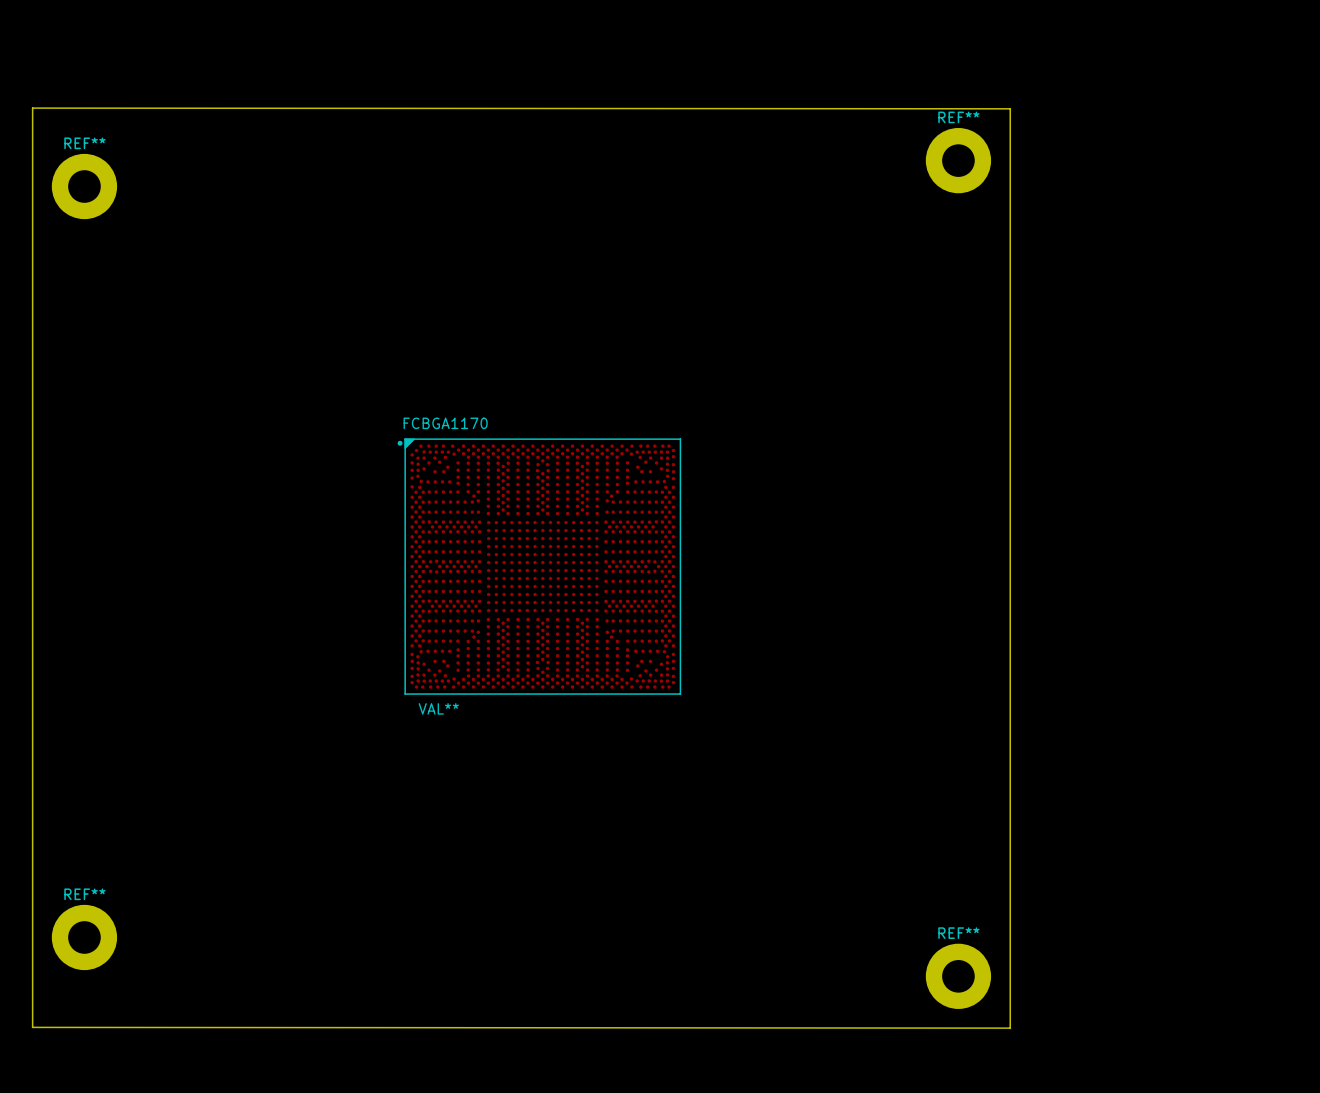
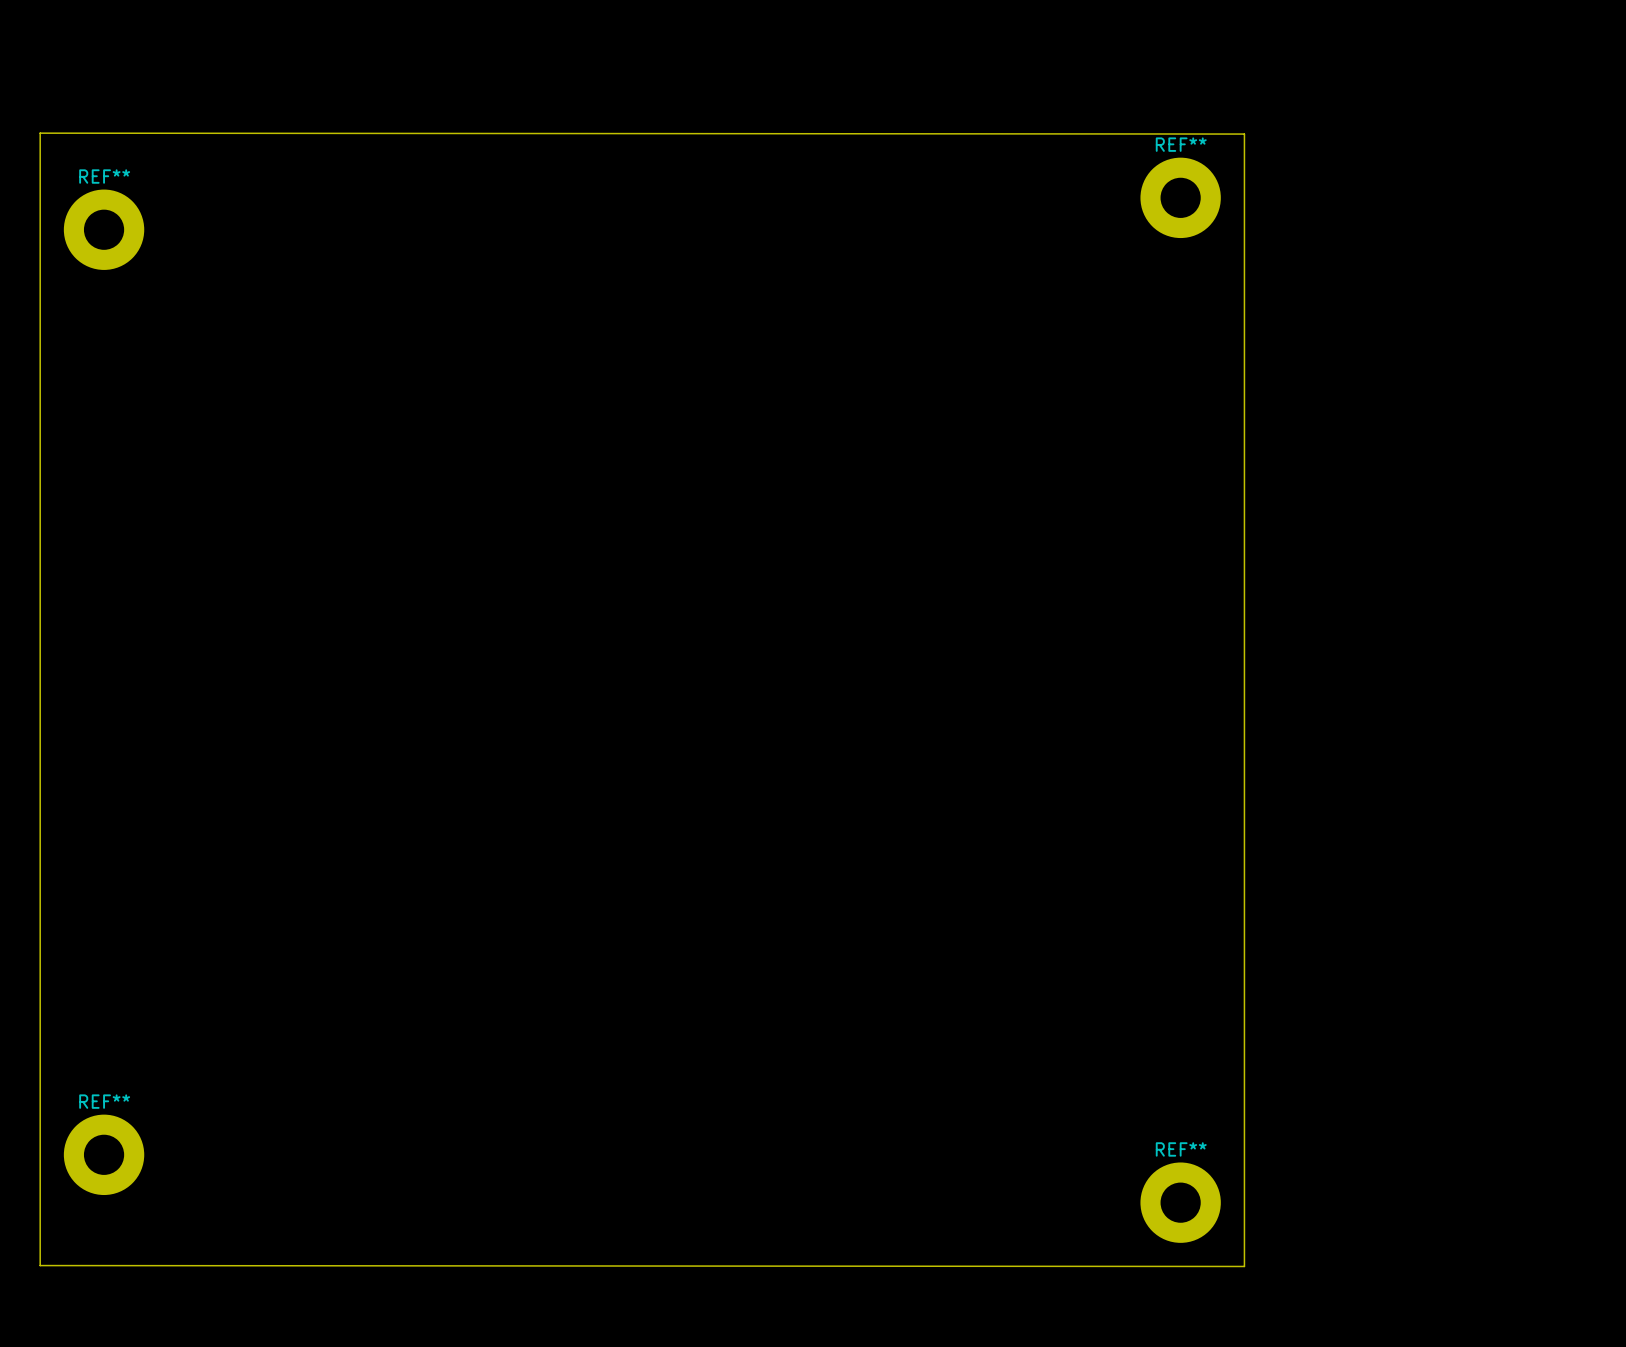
FCBGA1170: VAL** (539, 566) -> none

